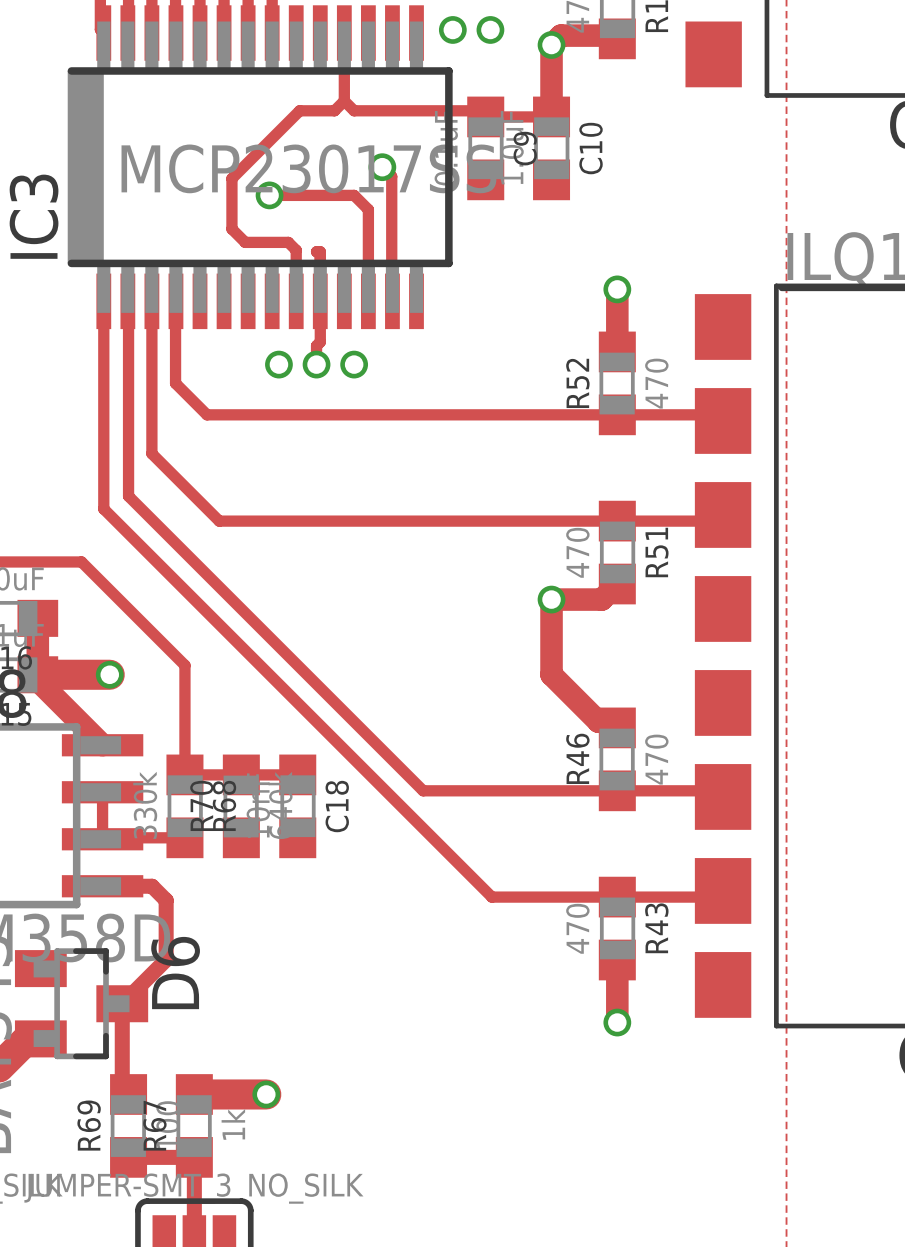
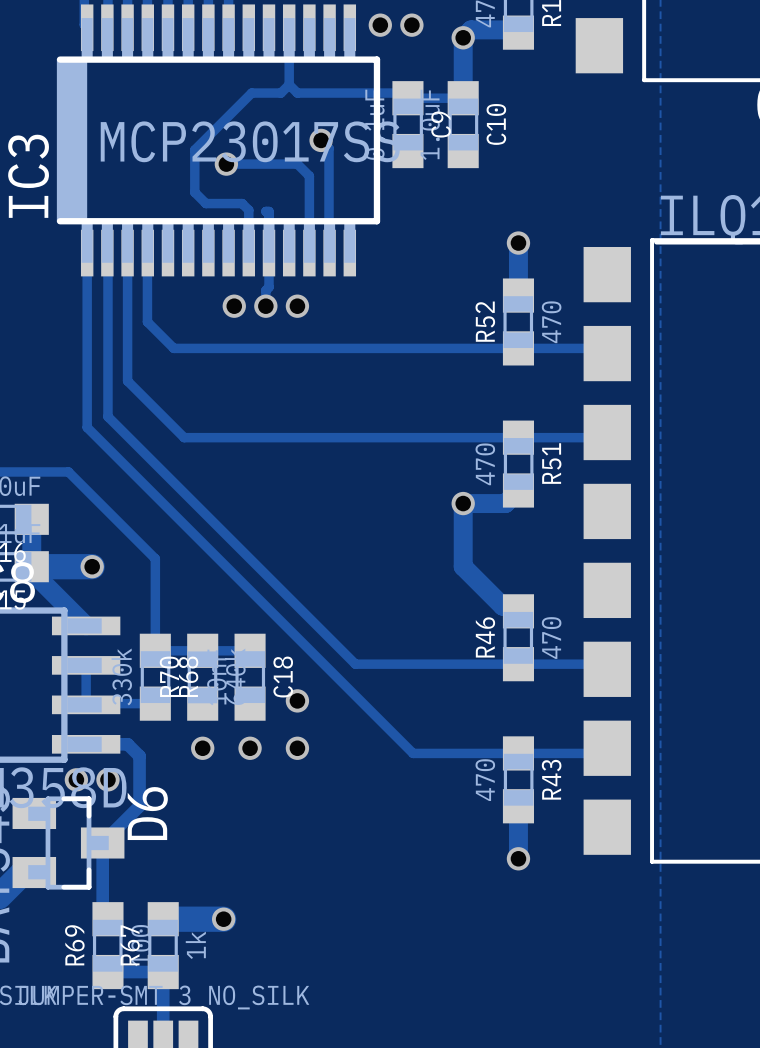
via: none -> (297, 700)
via: none -> (202, 748)
via: none -> (250, 748)
via: none -> (297, 748)
via: none -> (76, 779)
via: none -> (107, 779)

